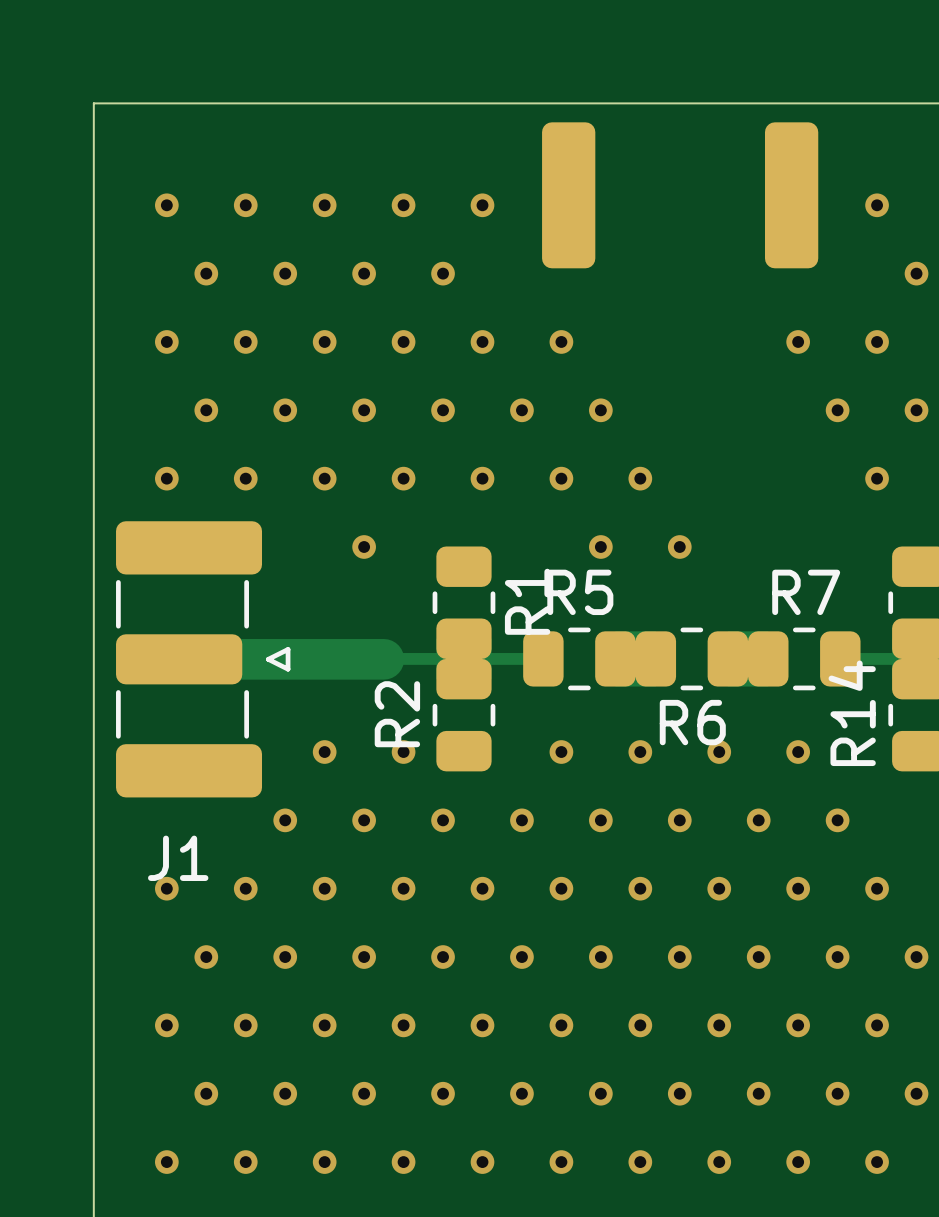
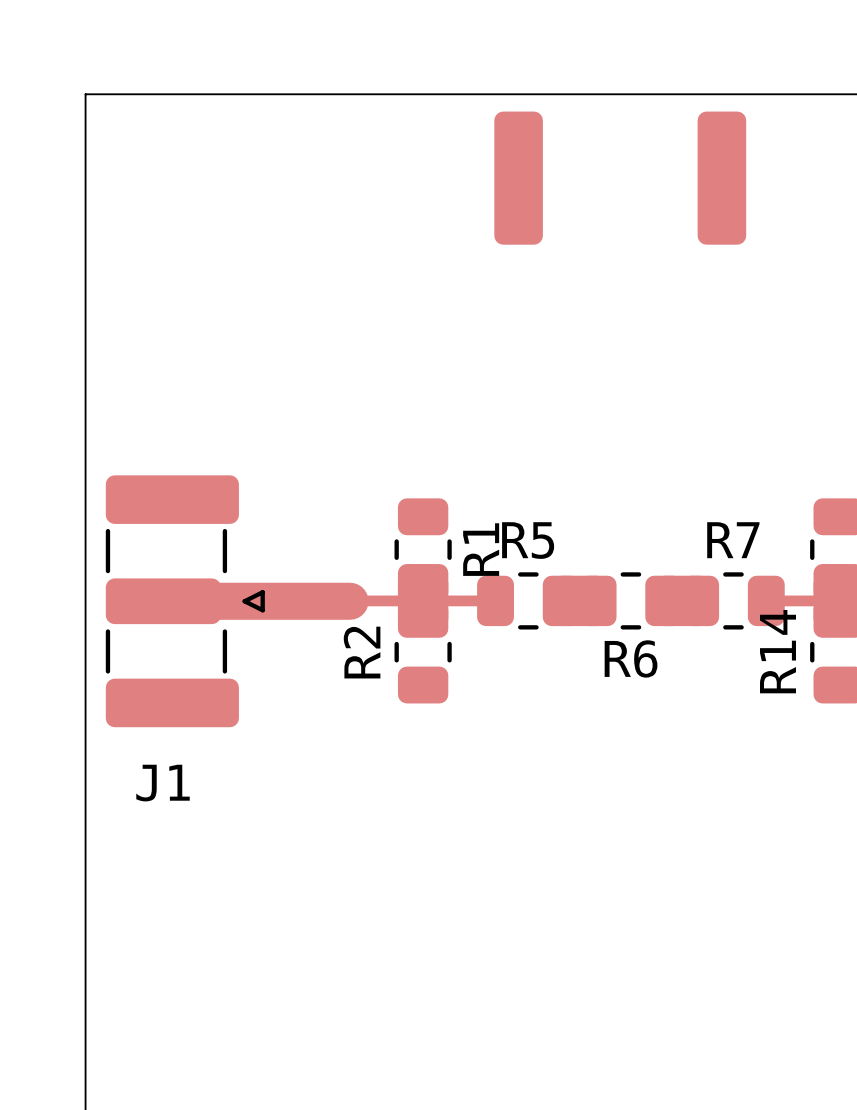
via: (166, 205) -> none
via: (245, 205) -> none
via: (324, 205) -> none
via: (403, 205) -> none
via: (482, 205) -> none
via: (877, 205) -> none
via: (206, 273) -> none
via: (285, 273) -> none
via: (364, 273) -> none
via: (443, 273) -> none
via: (916, 273) -> none
via: (166, 341) -> none
via: (245, 341) -> none
via: (324, 341) -> none
via: (403, 341) -> none
via: (482, 341) -> none
via: (561, 341) -> none
via: (798, 341) -> none
via: (877, 341) -> none
via: (206, 410) -> none
via: (285, 410) -> none
via: (364, 410) -> none
via: (443, 410) -> none
via: (521, 410) -> none
via: (600, 410) -> none
via: (837, 410) -> none
via: (916, 410) -> none
via: (166, 478) -> none
via: (245, 478) -> none
via: (324, 478) -> none
via: (403, 478) -> none
via: (482, 478) -> none
via: (561, 478) -> none
via: (640, 478) -> none
via: (877, 478) -> none
via: (364, 546) -> none
via: (600, 546) -> none
via: (679, 546) -> none
via: (324, 752) -> none
via: (403, 752) -> none
via: (561, 752) -> none
via: (640, 752) -> none
via: (719, 752) -> none
via: (798, 752) -> none
via: (285, 820) -> none
via: (364, 820) -> none
via: (443, 820) -> none
via: (521, 820) -> none
via: (600, 820) -> none
via: (679, 820) -> none
via: (758, 820) -> none
via: (837, 820) -> none
via: (166, 888) -> none
via: (245, 888) -> none
via: (324, 888) -> none
via: (403, 888) -> none
via: (482, 888) -> none
via: (561, 888) -> none
via: (640, 888) -> none
via: (719, 888) -> none
via: (798, 888) -> none
via: (877, 888) -> none
via: (206, 957) -> none
via: (285, 957) -> none
via: (364, 957) -> none
via: (443, 957) -> none
via: (521, 957) -> none
via: (600, 957) -> none
via: (679, 957) -> none
via: (758, 957) -> none
via: (837, 957) -> none
via: (916, 957) -> none
via: (166, 1025) -> none
via: (245, 1025) -> none
via: (324, 1025) -> none
via: (403, 1025) -> none
via: (482, 1025) -> none
via: (561, 1025) -> none
via: (640, 1025) -> none
via: (719, 1025) -> none
via: (798, 1025) -> none
via: (877, 1025) -> none
via: (206, 1093) -> none
via: (285, 1093) -> none
via: (364, 1093) -> none
via: (443, 1093) -> none
via: (521, 1093) -> none
via: (600, 1093) -> none
via: (679, 1093) -> none
via: (758, 1093) -> none
via: (837, 1093) -> none
via: (916, 1093) -> none
via: (166, 1162) -> none
via: (245, 1162) -> none
via: (324, 1162) -> none
via: (403, 1162) -> none
via: (482, 1162) -> none
via: (561, 1162) -> none
via: (640, 1162) -> none
via: (719, 1162) -> none
via: (798, 1162) -> none
via: (877, 1162) -> none

